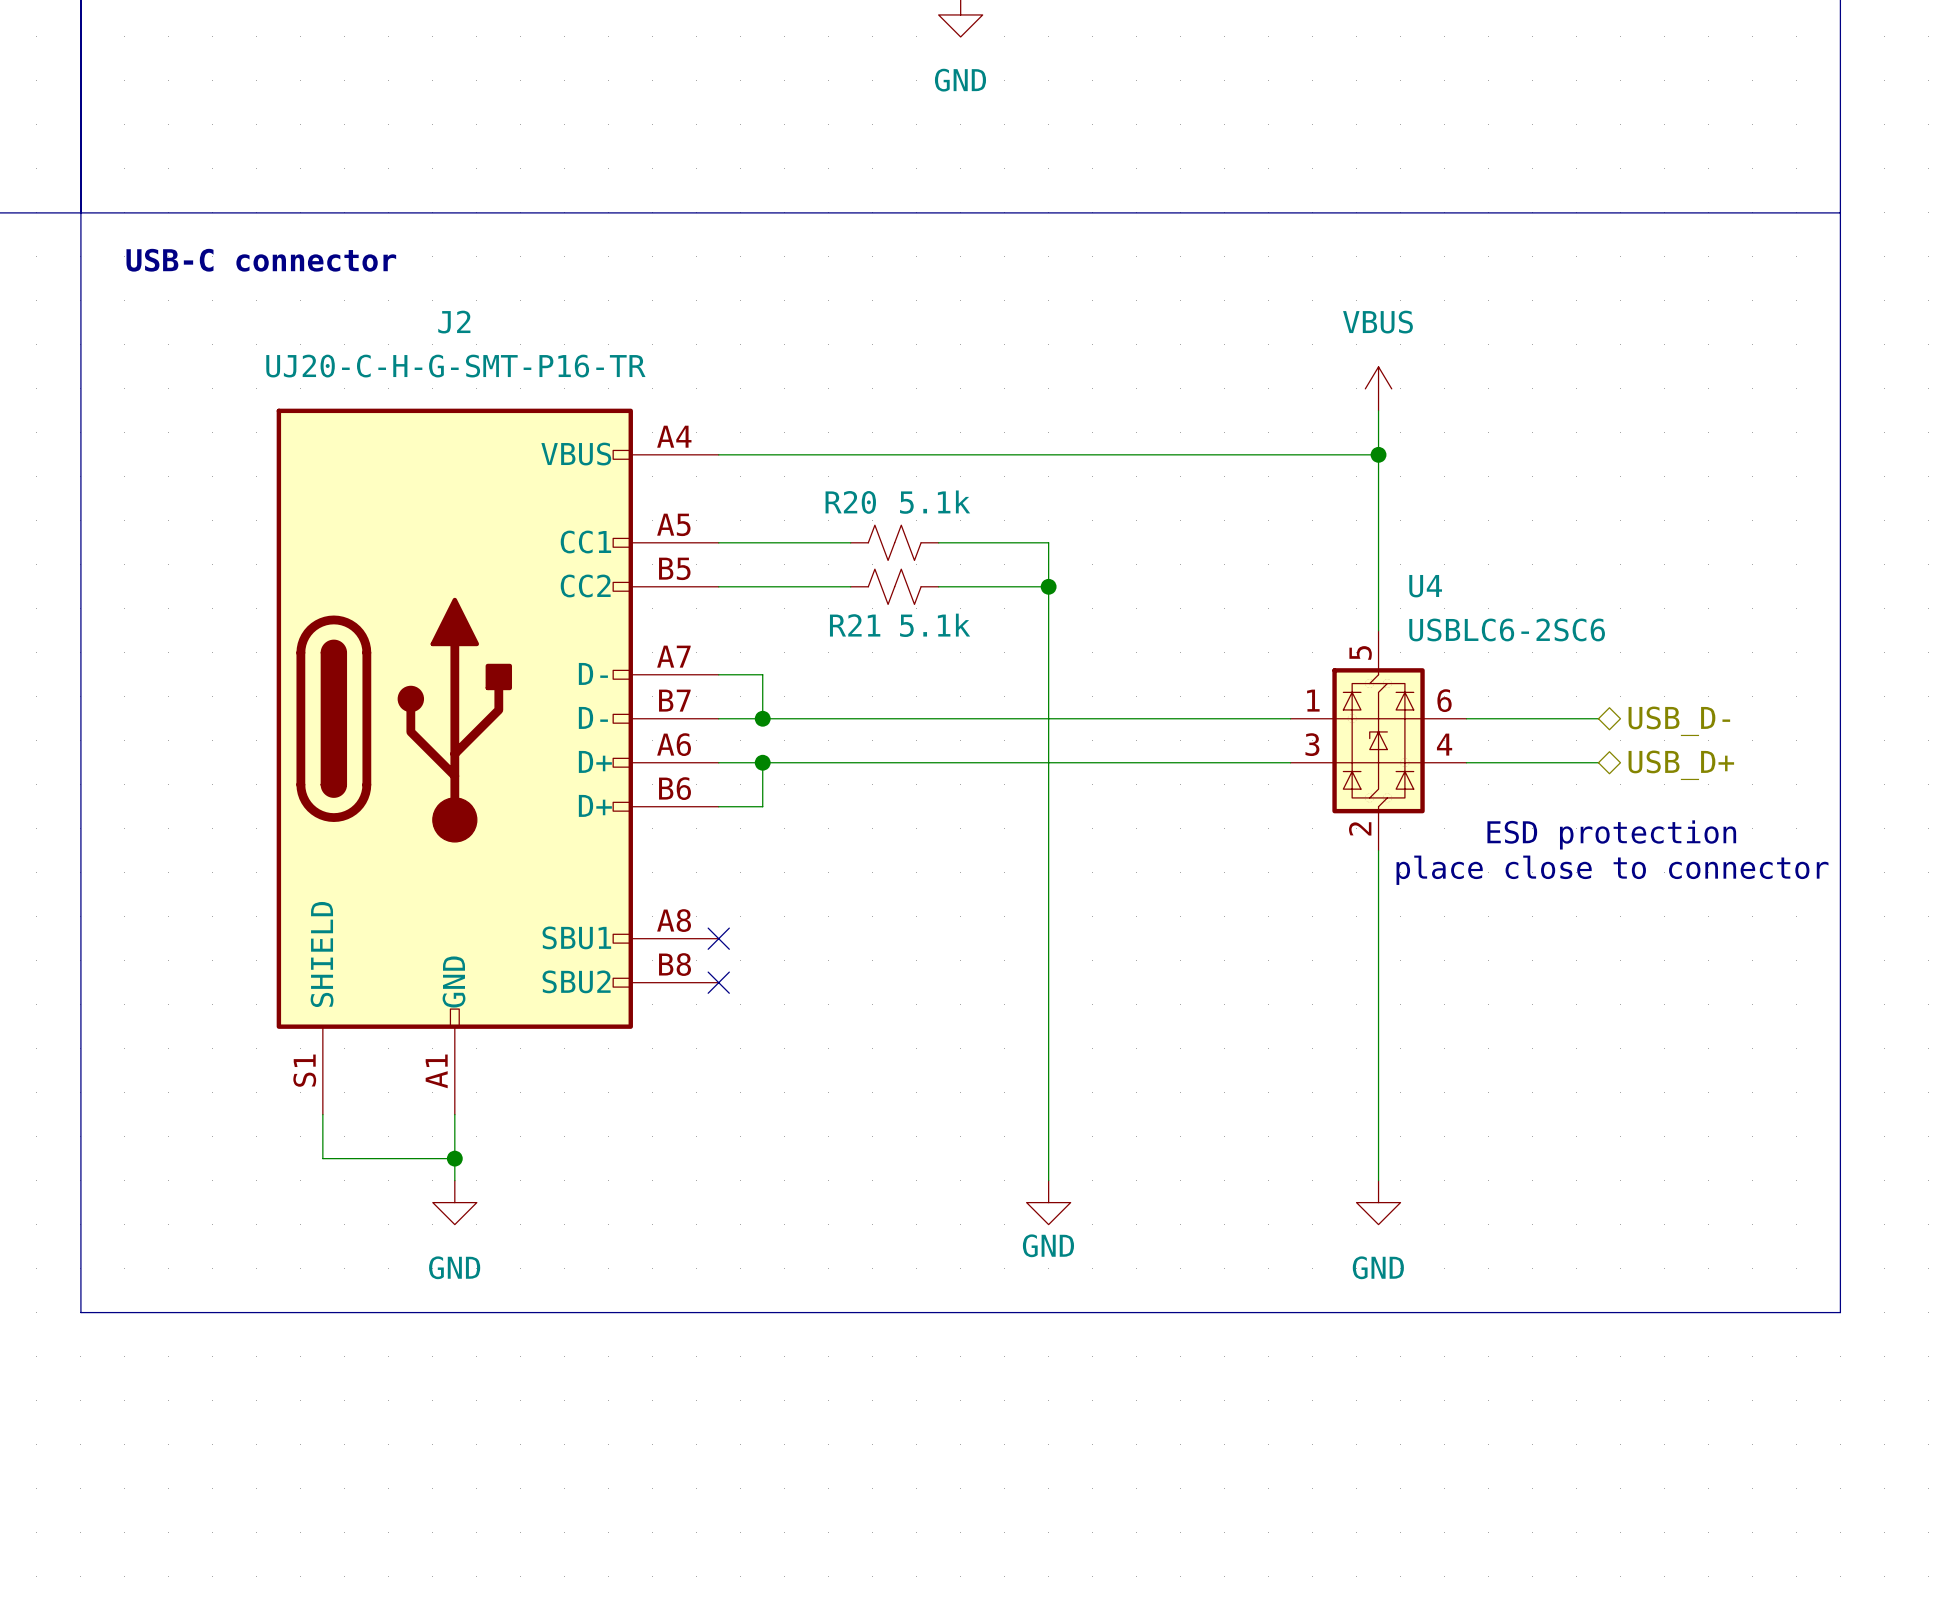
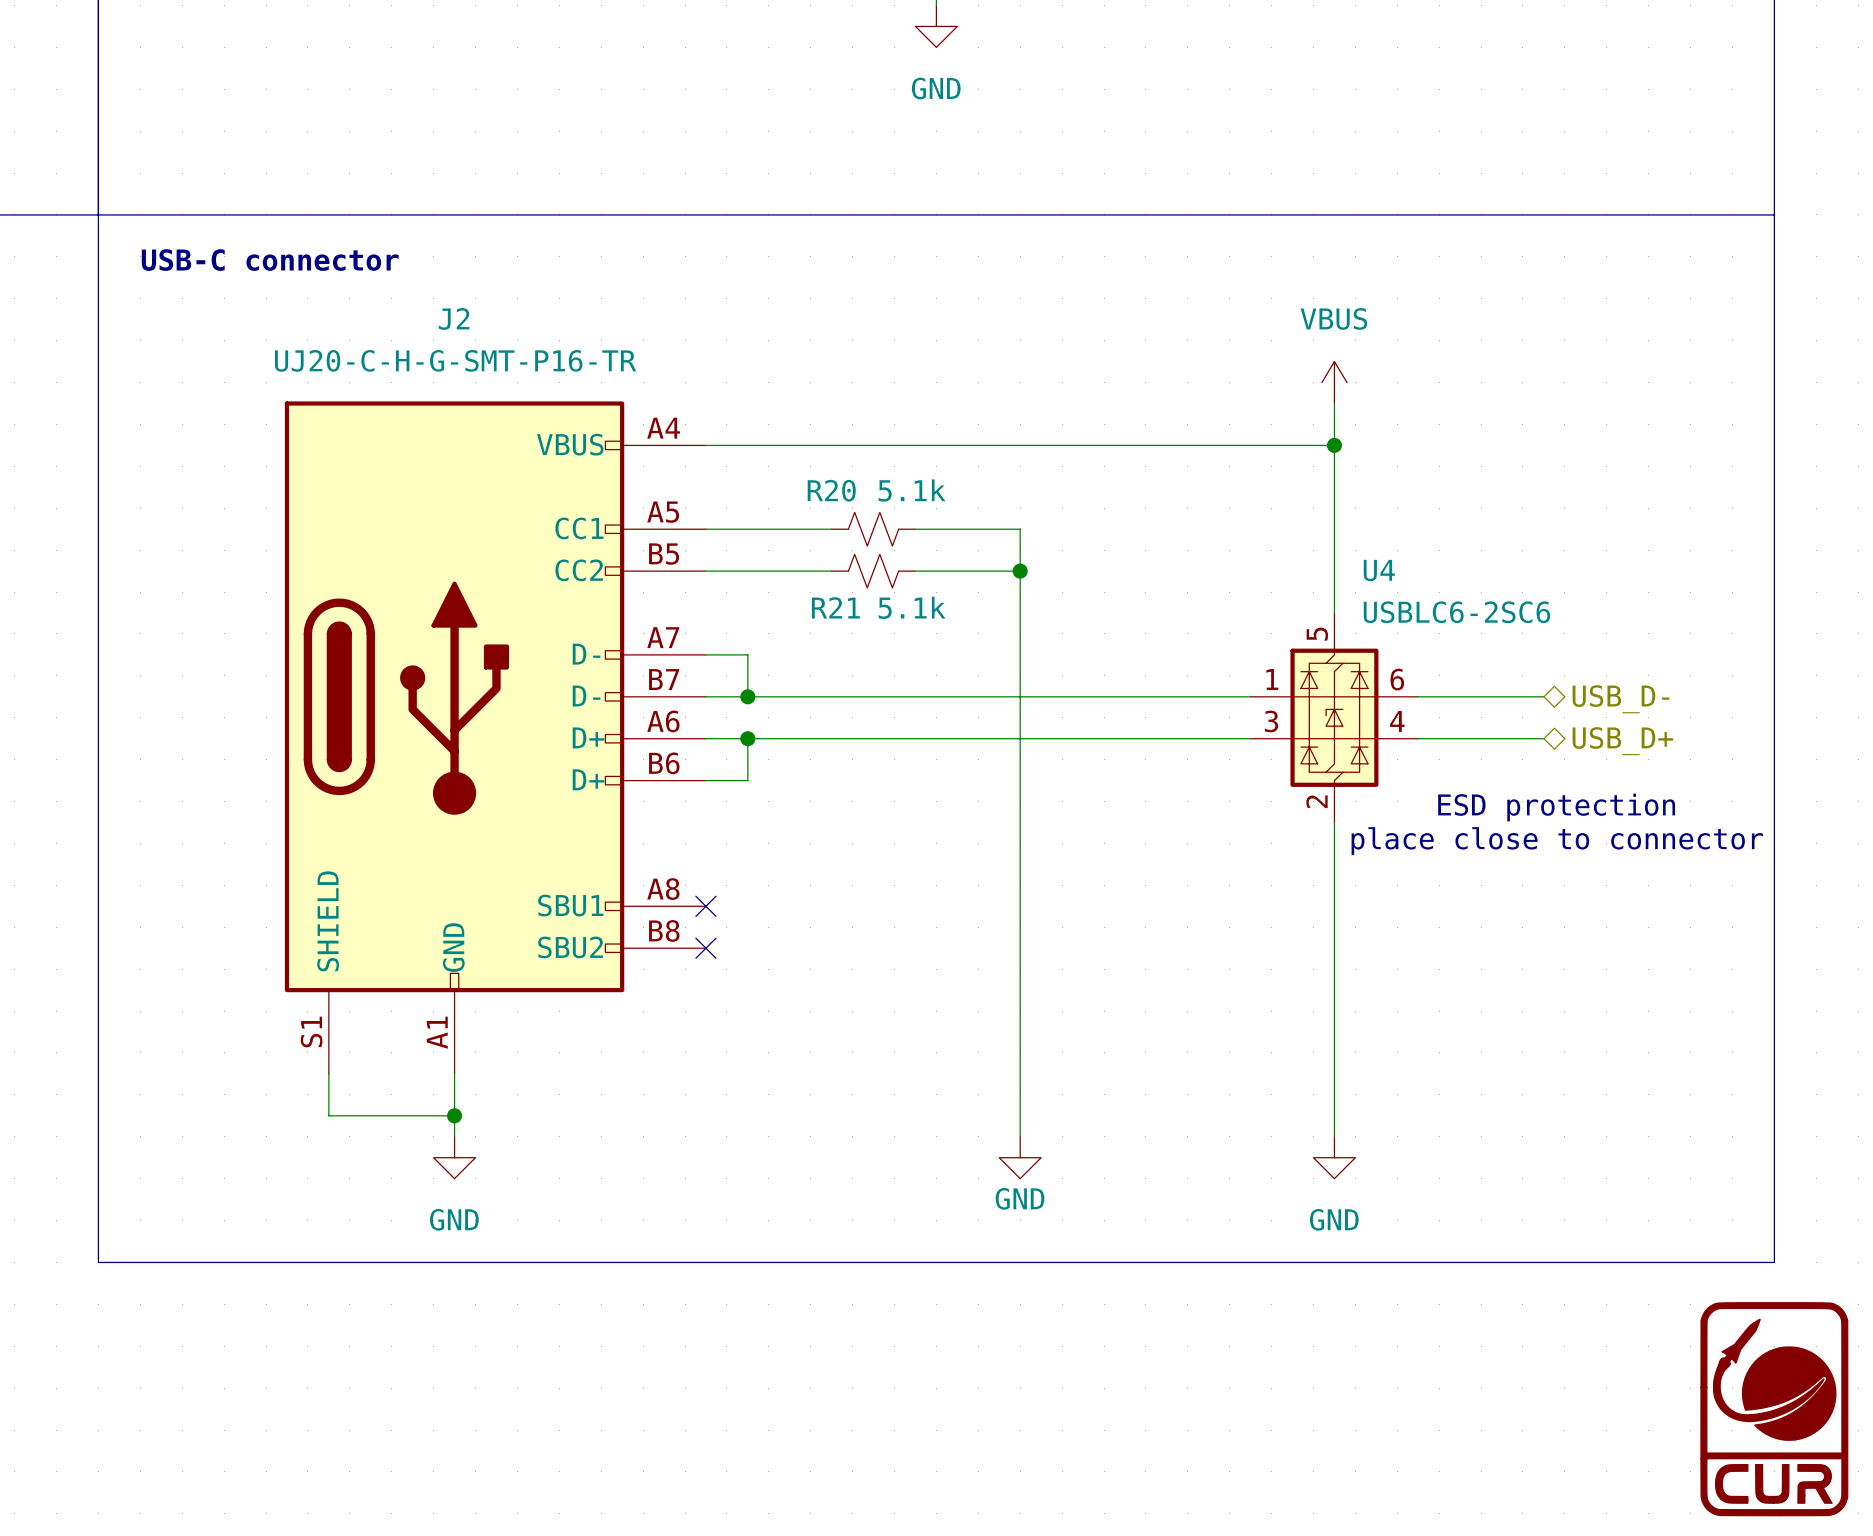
power symbol: none -> (1774, 1409)

